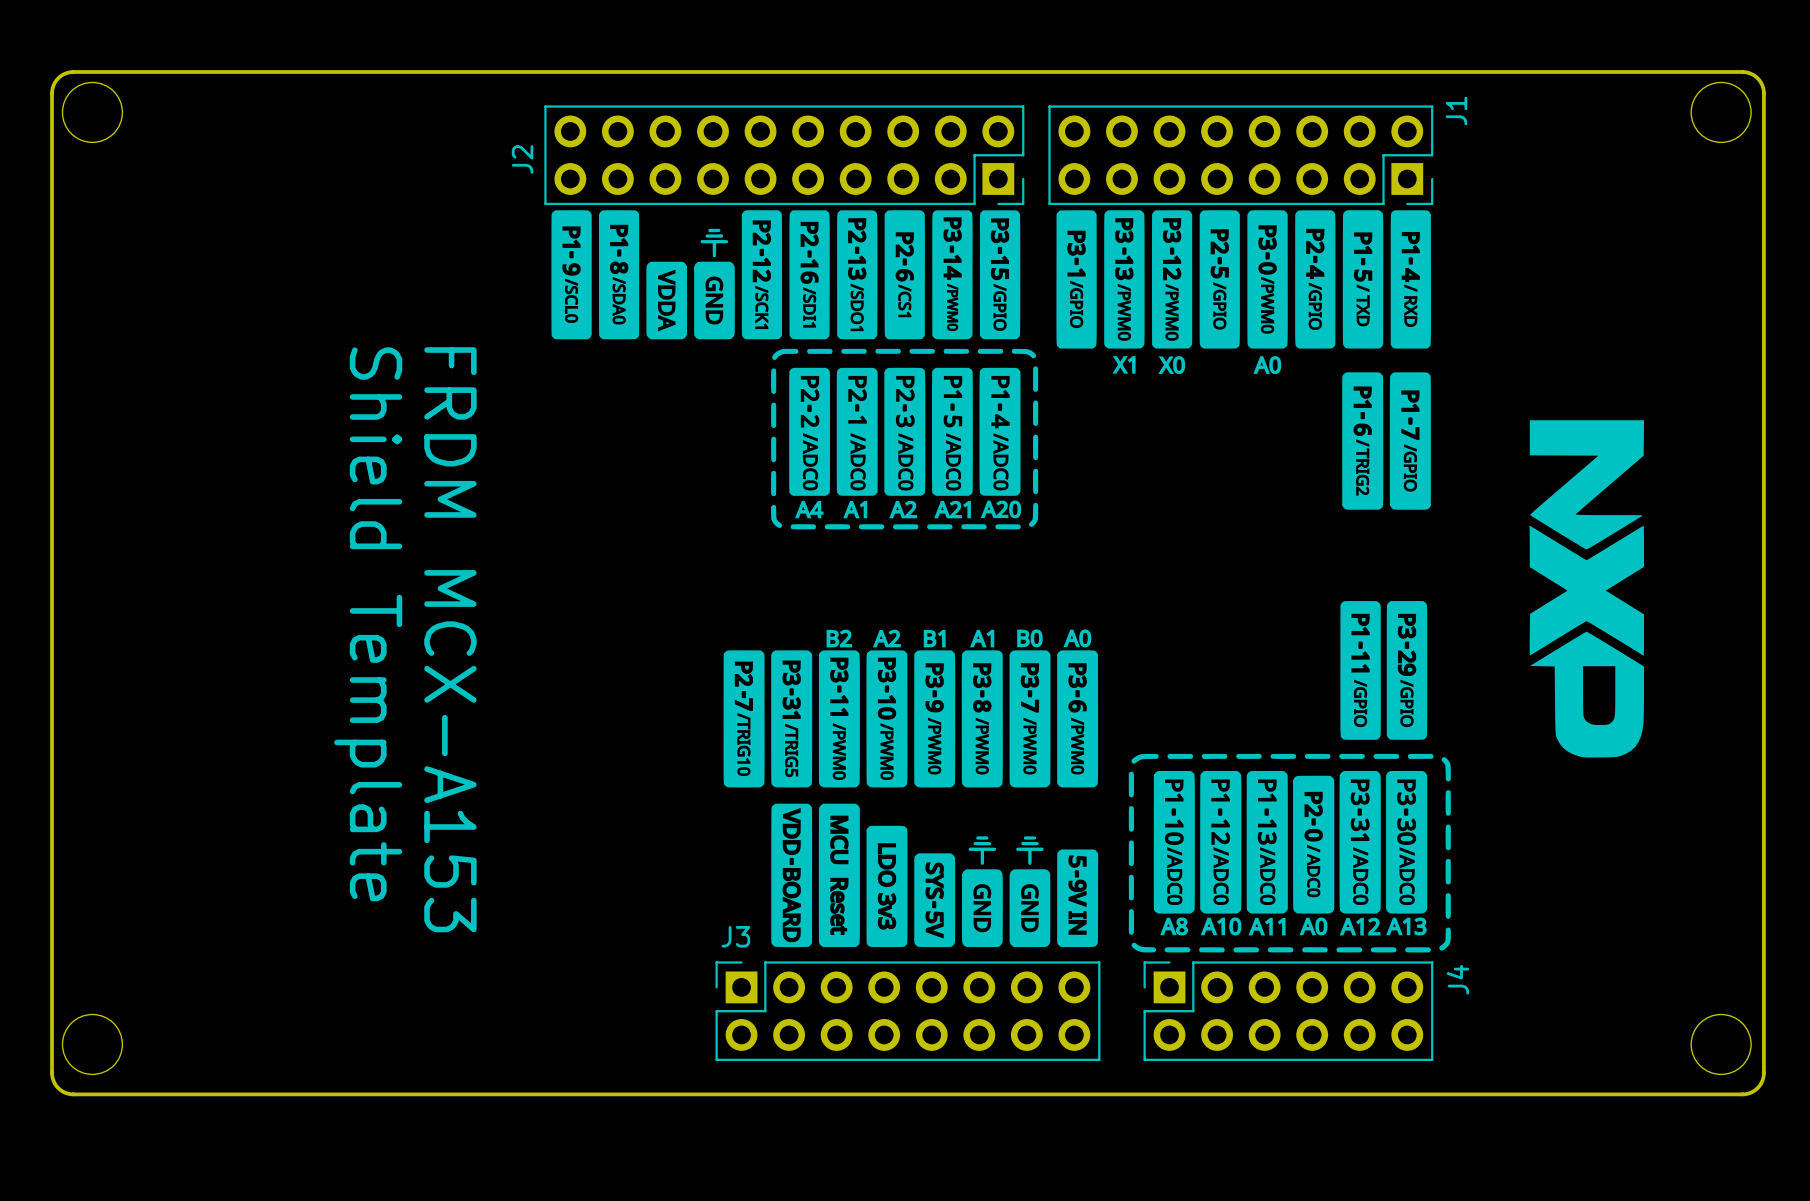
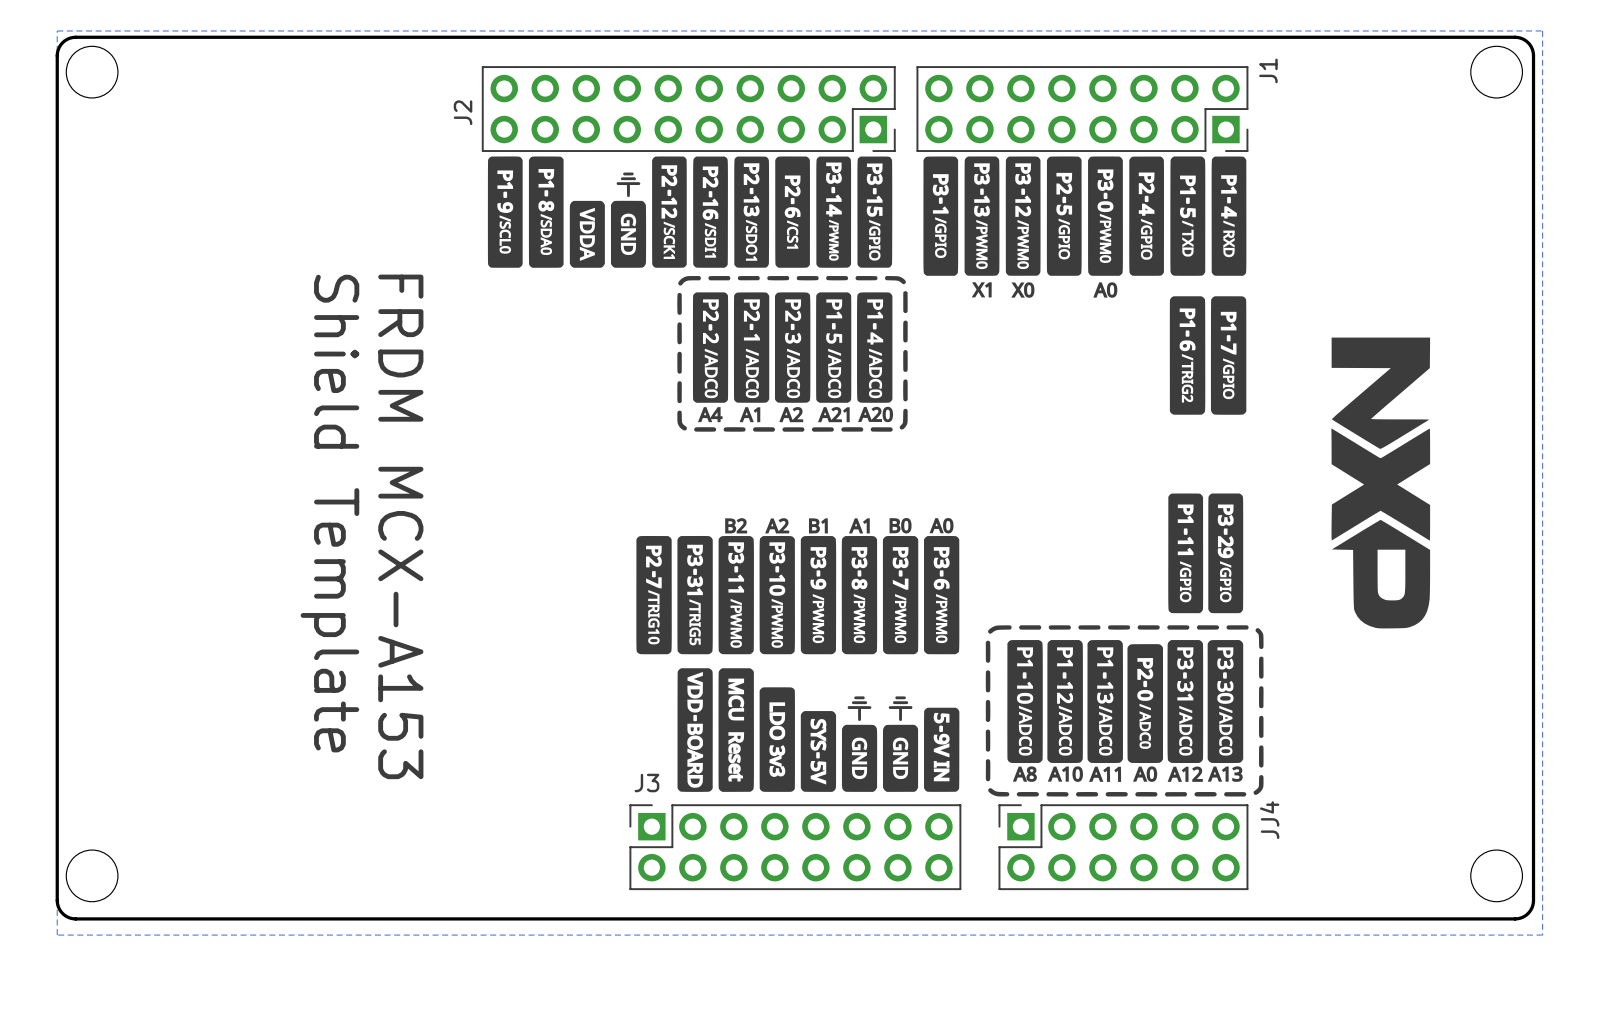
bottom zone outline: none -> (57, 30) (1542, 30) (1542, 935) (57, 935) (57, 30)
J4 name: J4 (1457, 979) -> JJ4 (1269, 820)

